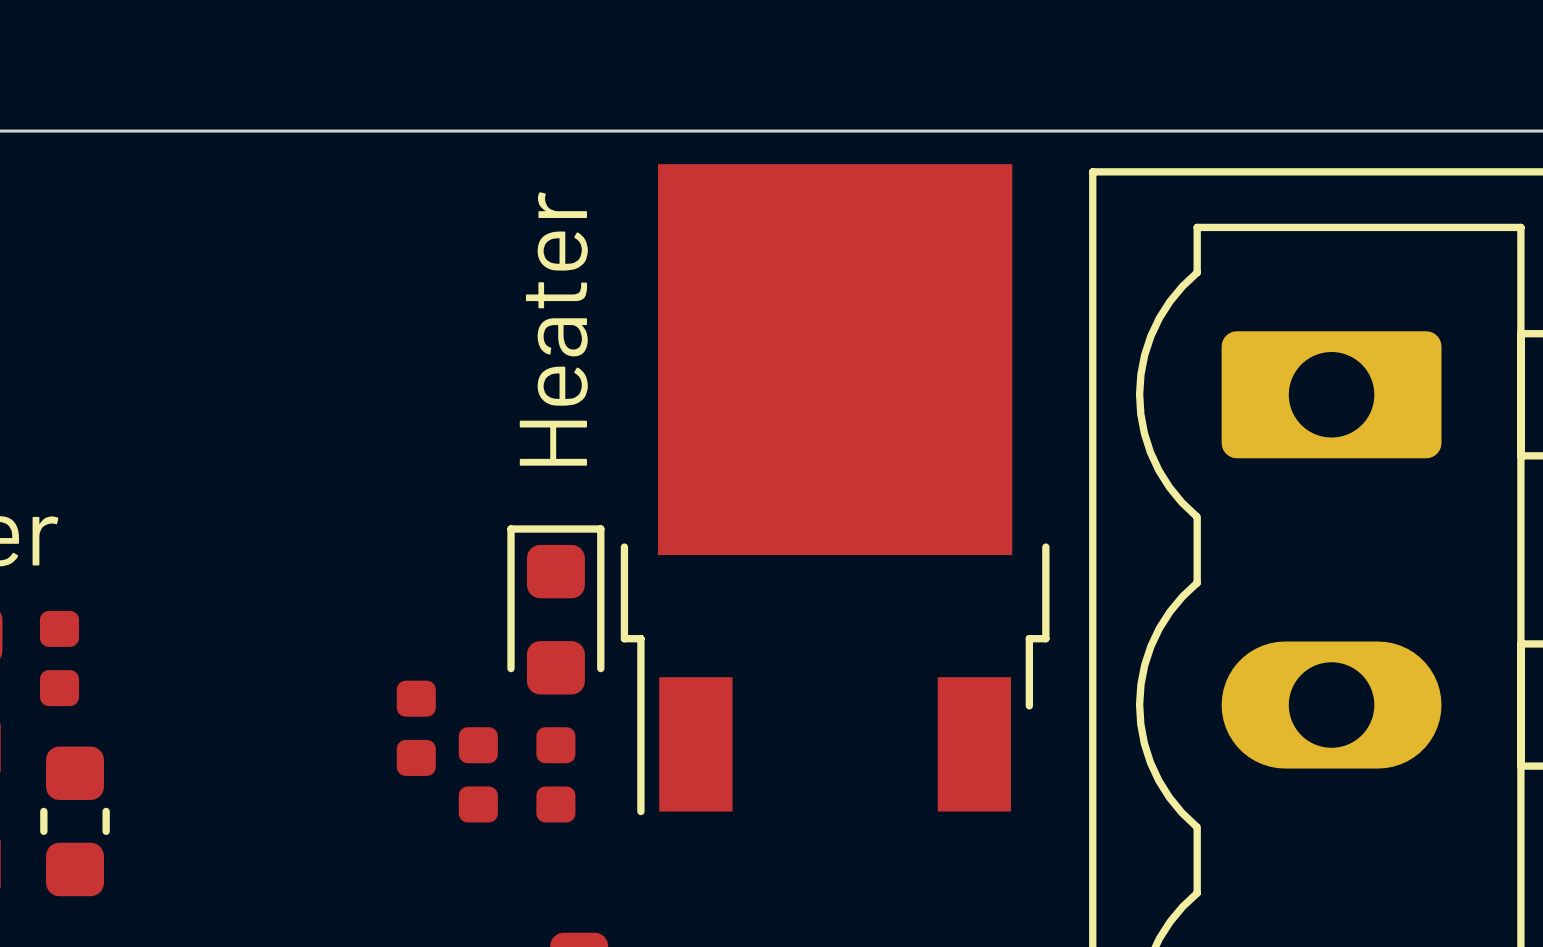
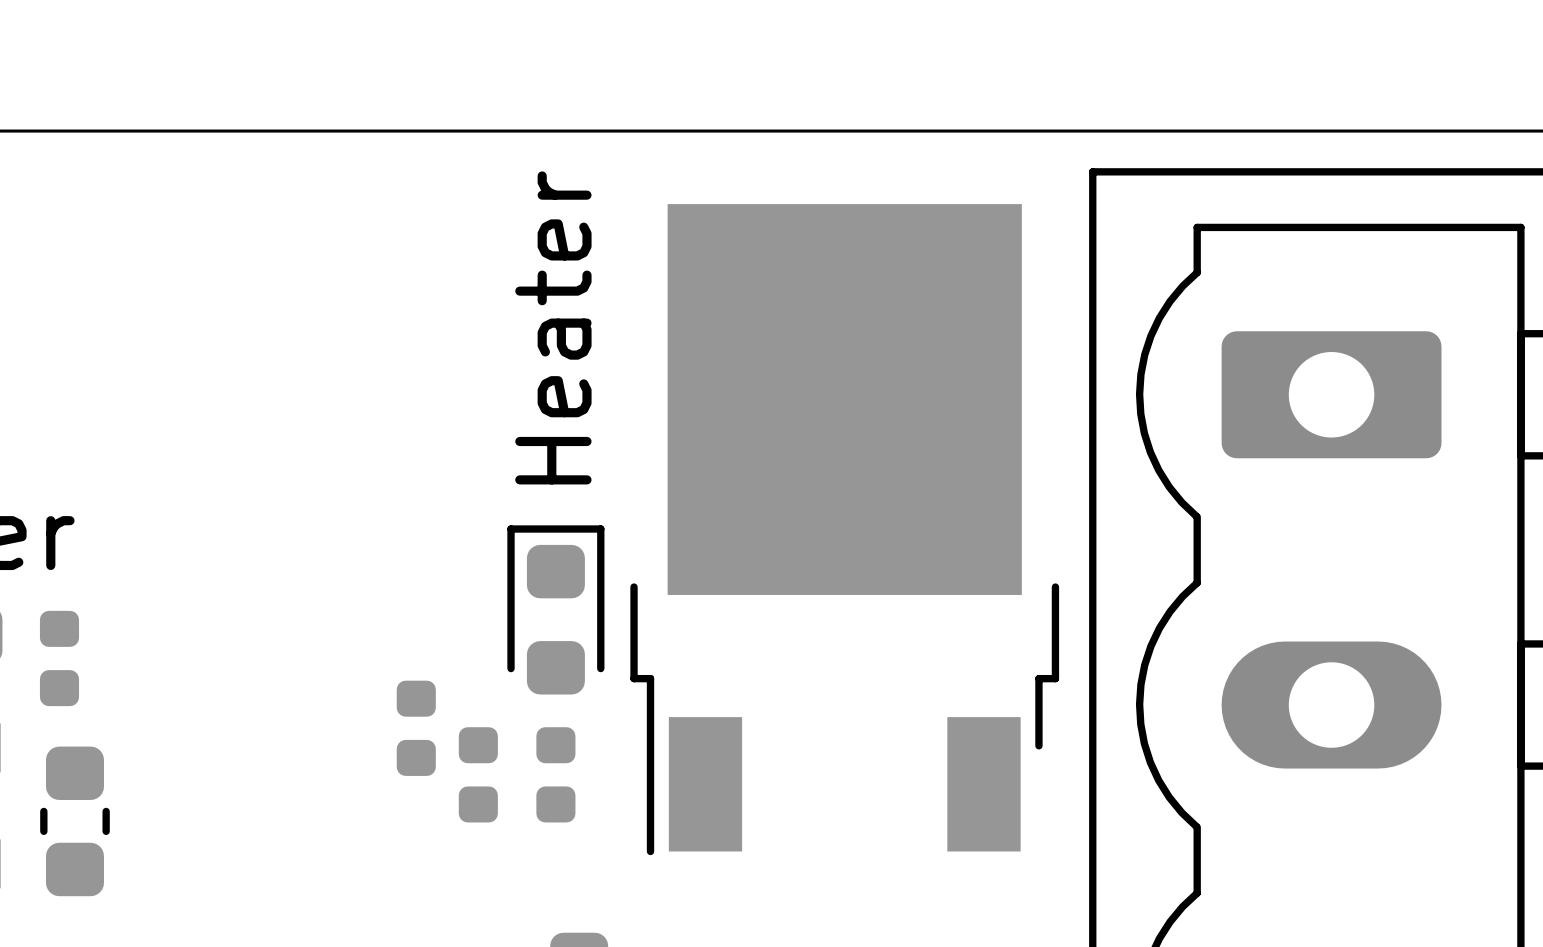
part position: (835, 489) -> (844, 529)

